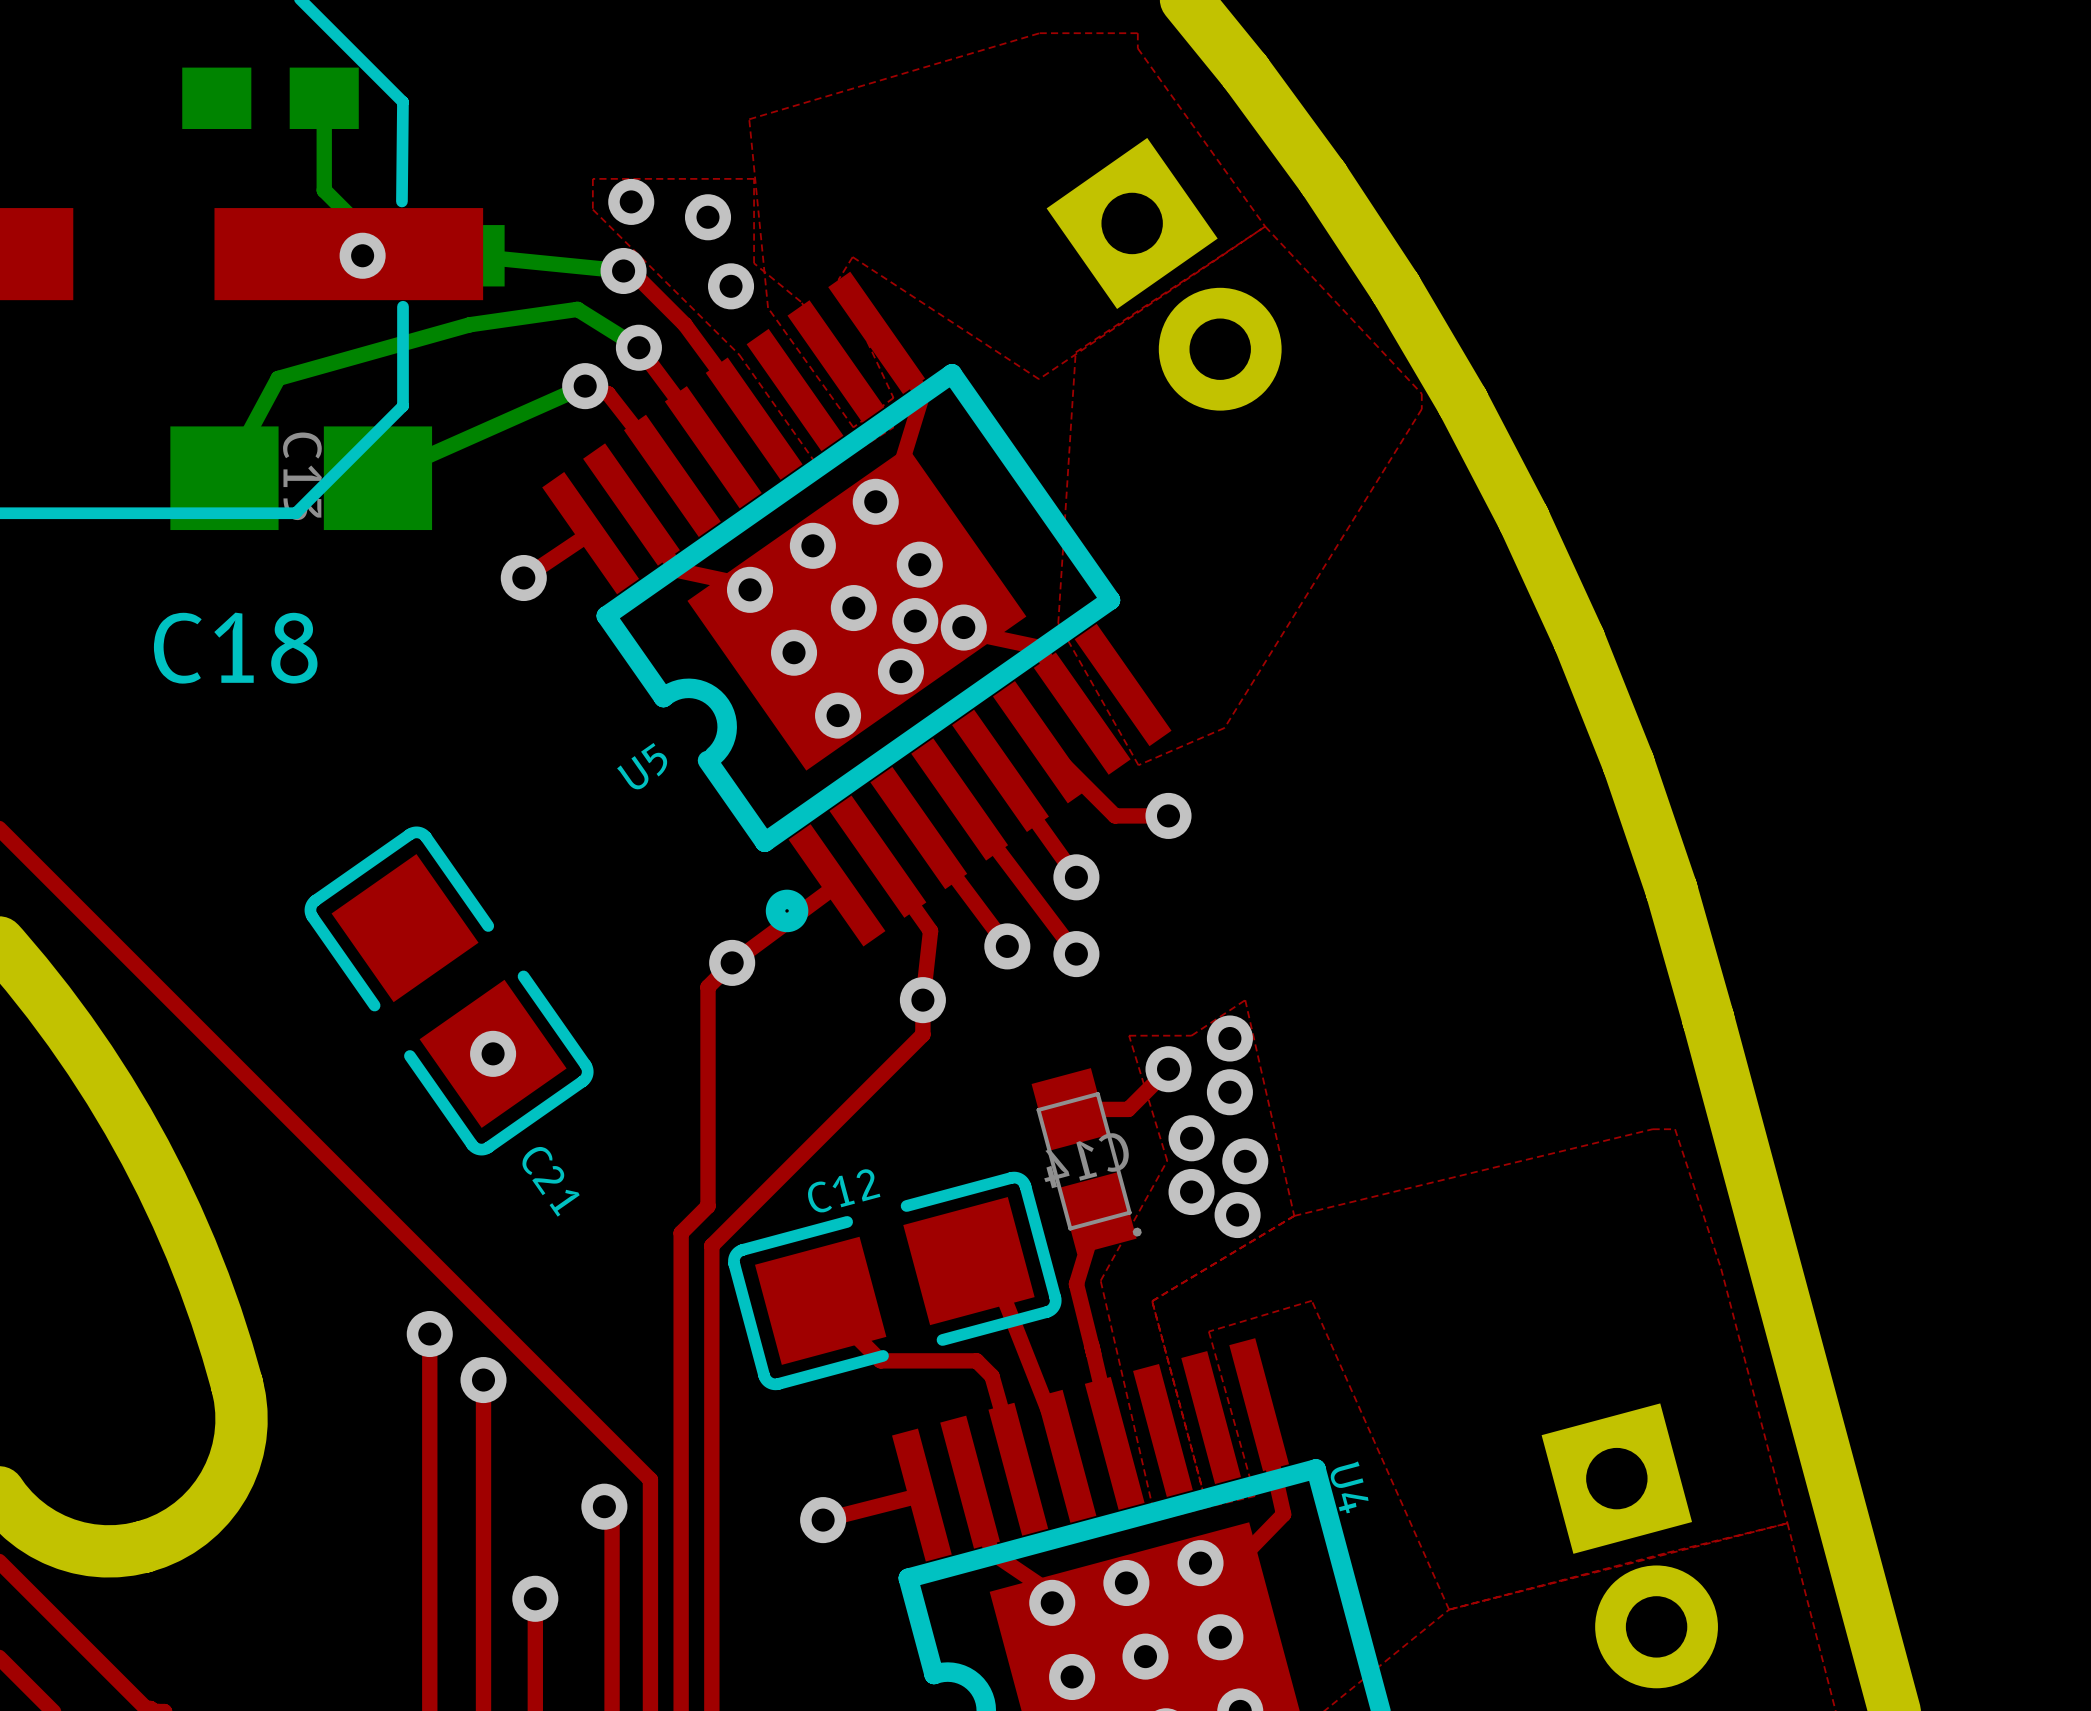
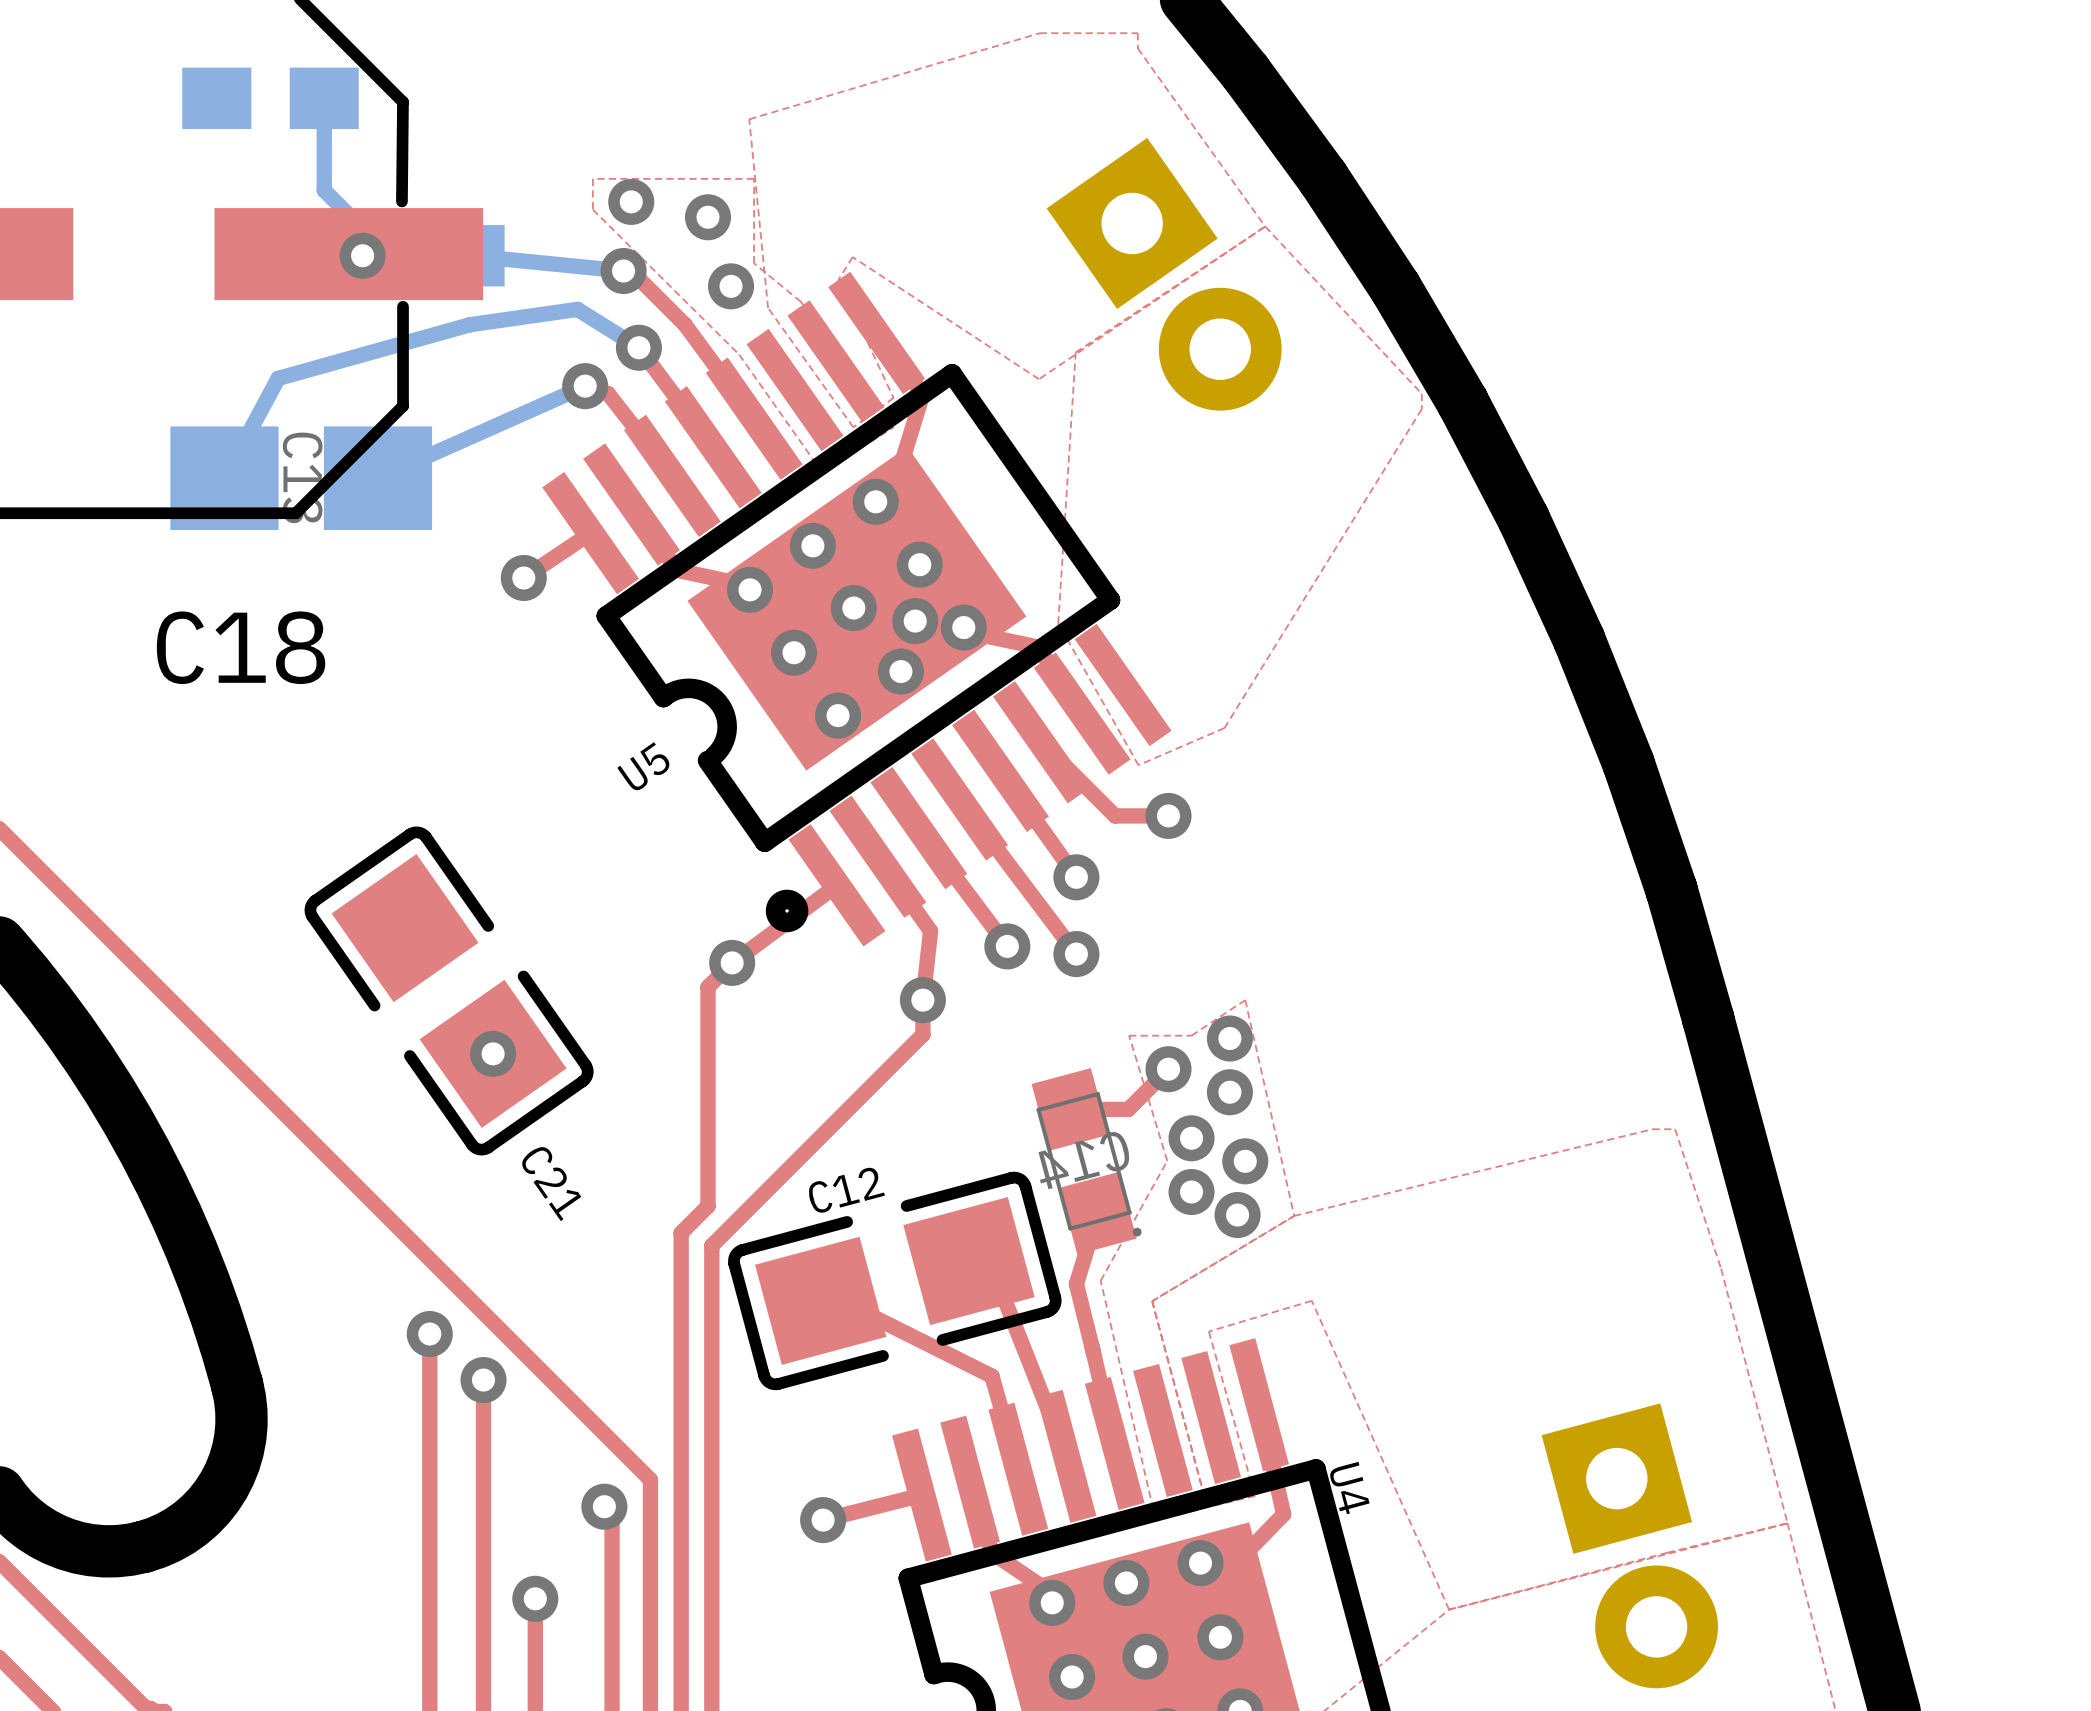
top track: (820, 1300) (880, 1360) (976, 1360) (991, 1376) -> (841, 1300) (991, 1376)

